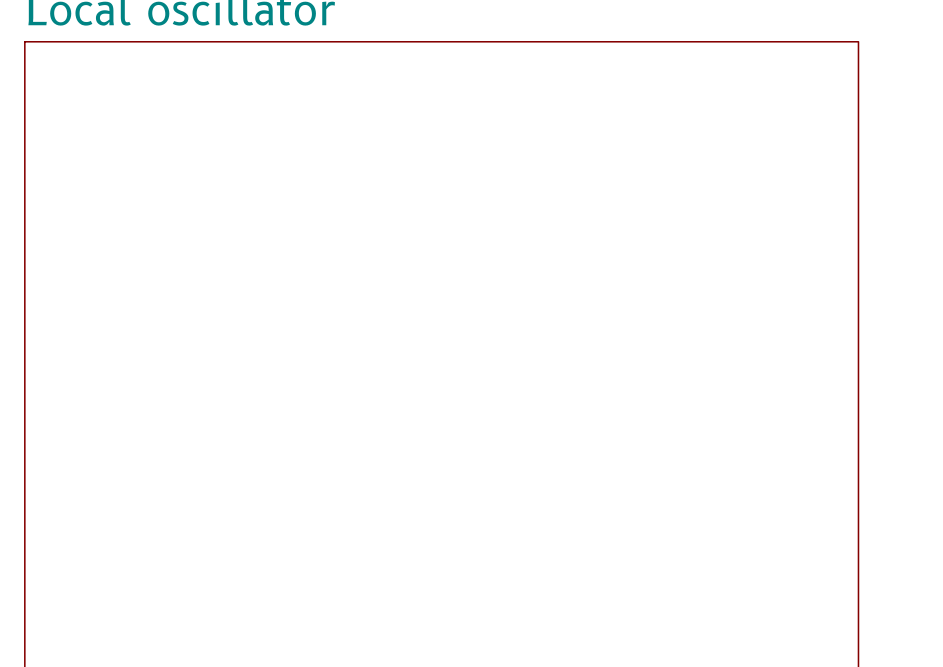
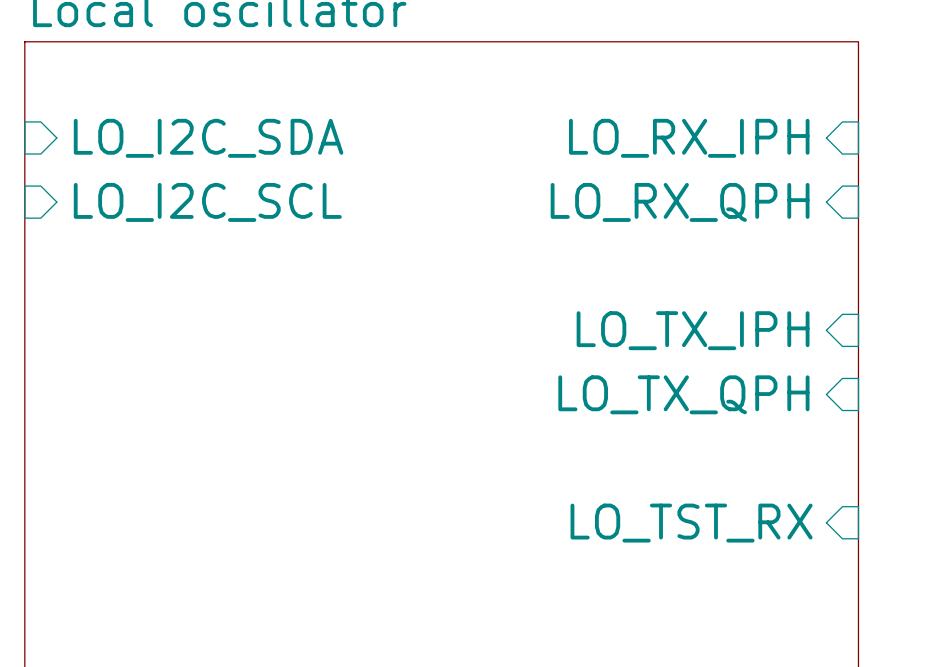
sheet pin: none -> LO_I2C_SDA (208, 138)
sheet pin: none -> LO_RX_IPH (689, 138)
sheet pin: none -> LO_I2C_SCL (207, 202)
sheet pin: none -> LO_RX_QPH (680, 202)
sheet pin: none -> LO_TX_IPH (693, 330)
sheet pin: none -> LO_TX_QPH (683, 394)
sheet pin: none -> LO_TST_RX (691, 523)

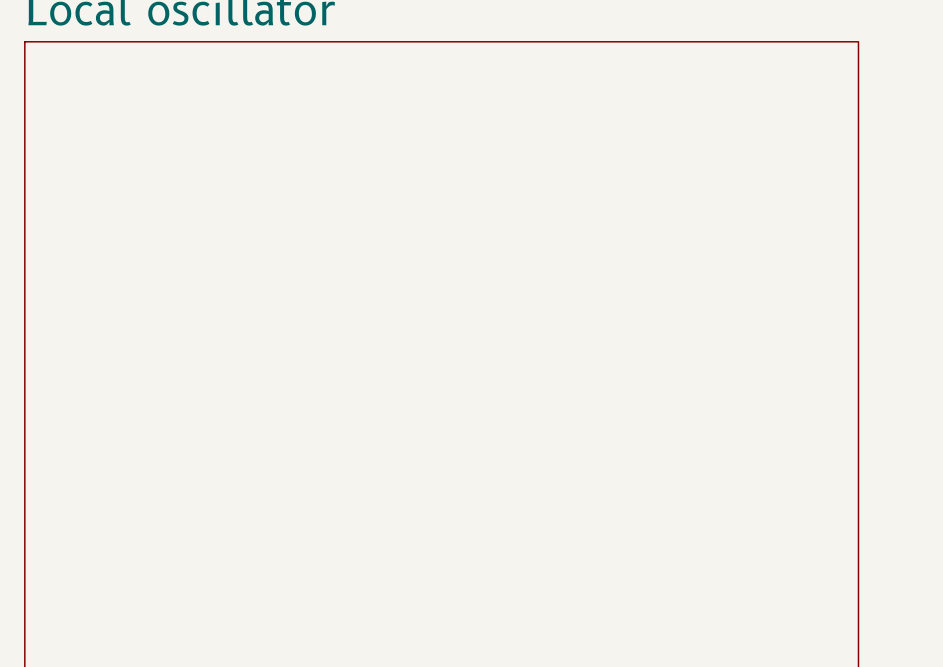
sheet pin: LO_I2C_SDA (208, 138) -> none
sheet pin: LO_RX_IPH (689, 138) -> none
sheet pin: LO_I2C_SCL (207, 202) -> none
sheet pin: LO_RX_QPH (680, 202) -> none
sheet pin: LO_TX_IPH (693, 330) -> none
sheet pin: LO_TX_QPH (683, 394) -> none
sheet pin: LO_TST_RX (691, 523) -> none

